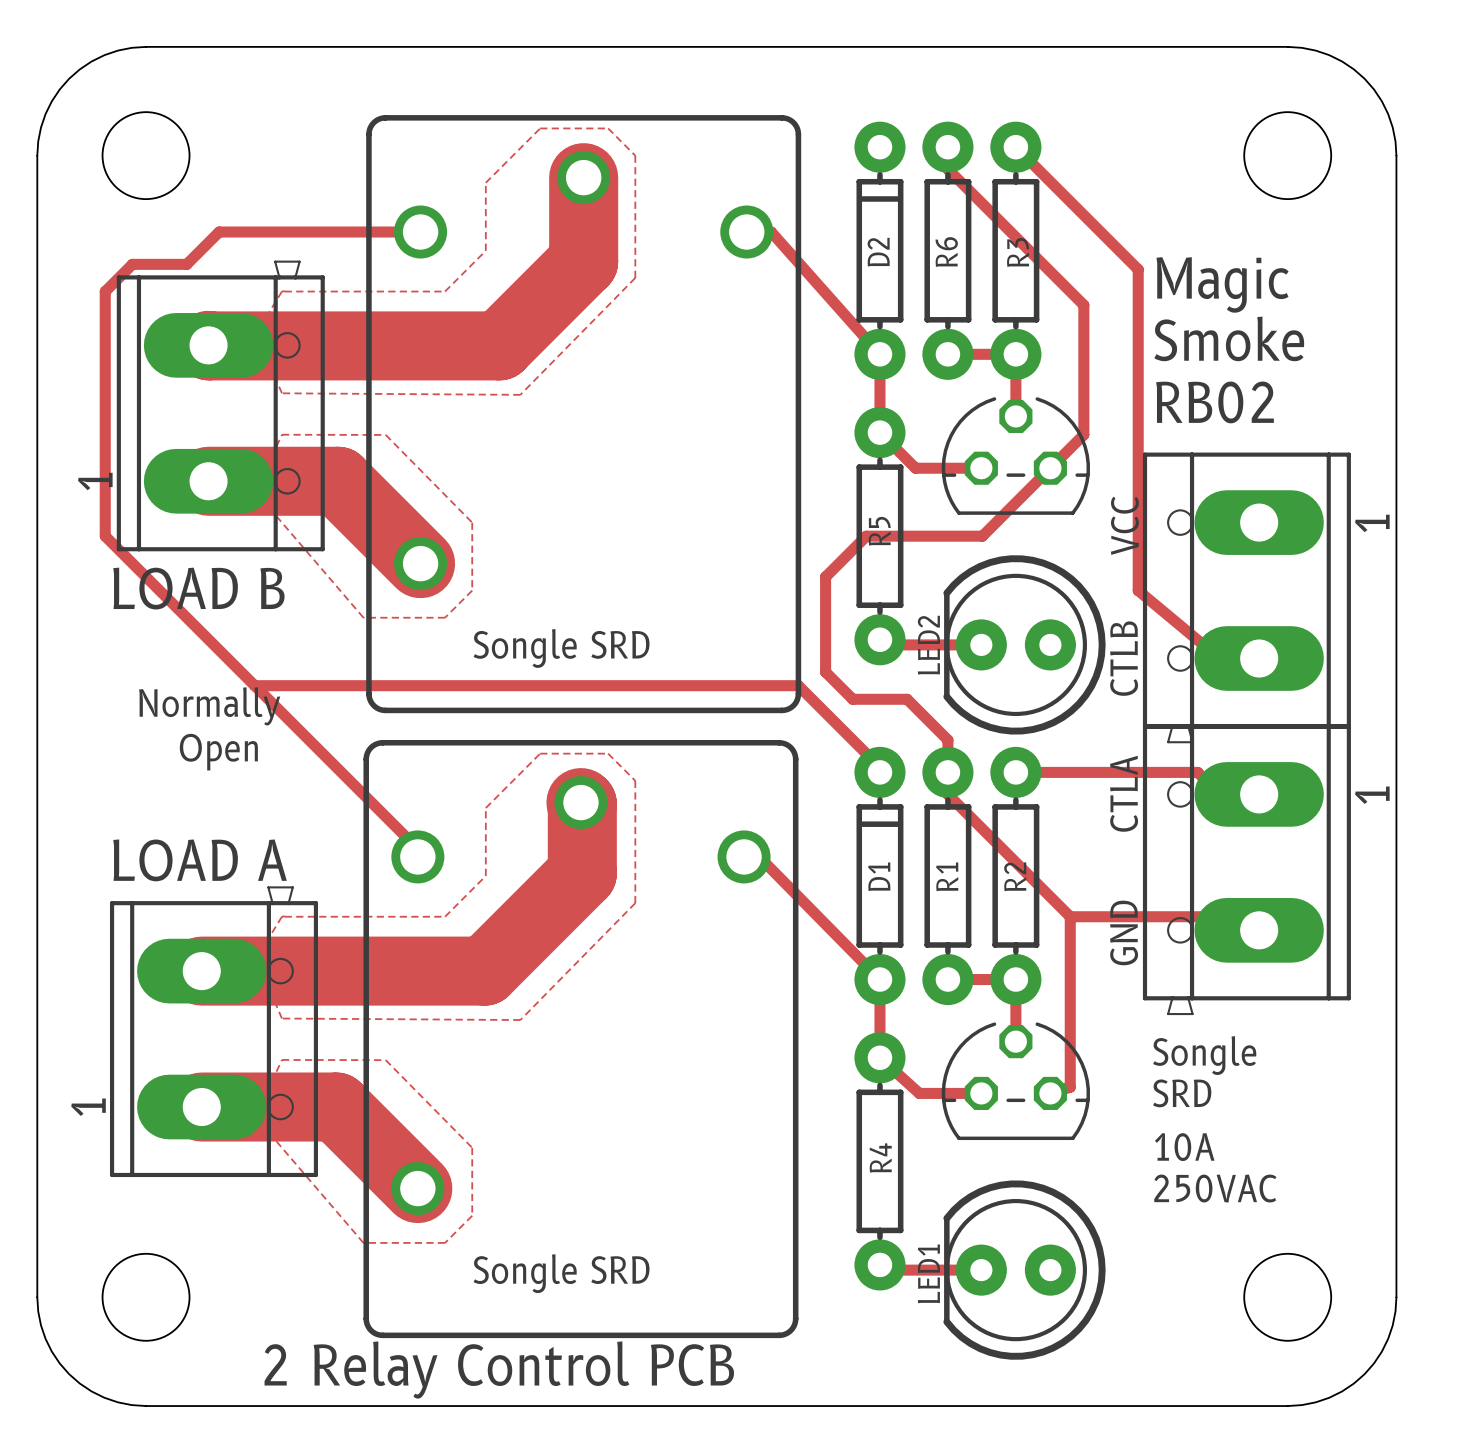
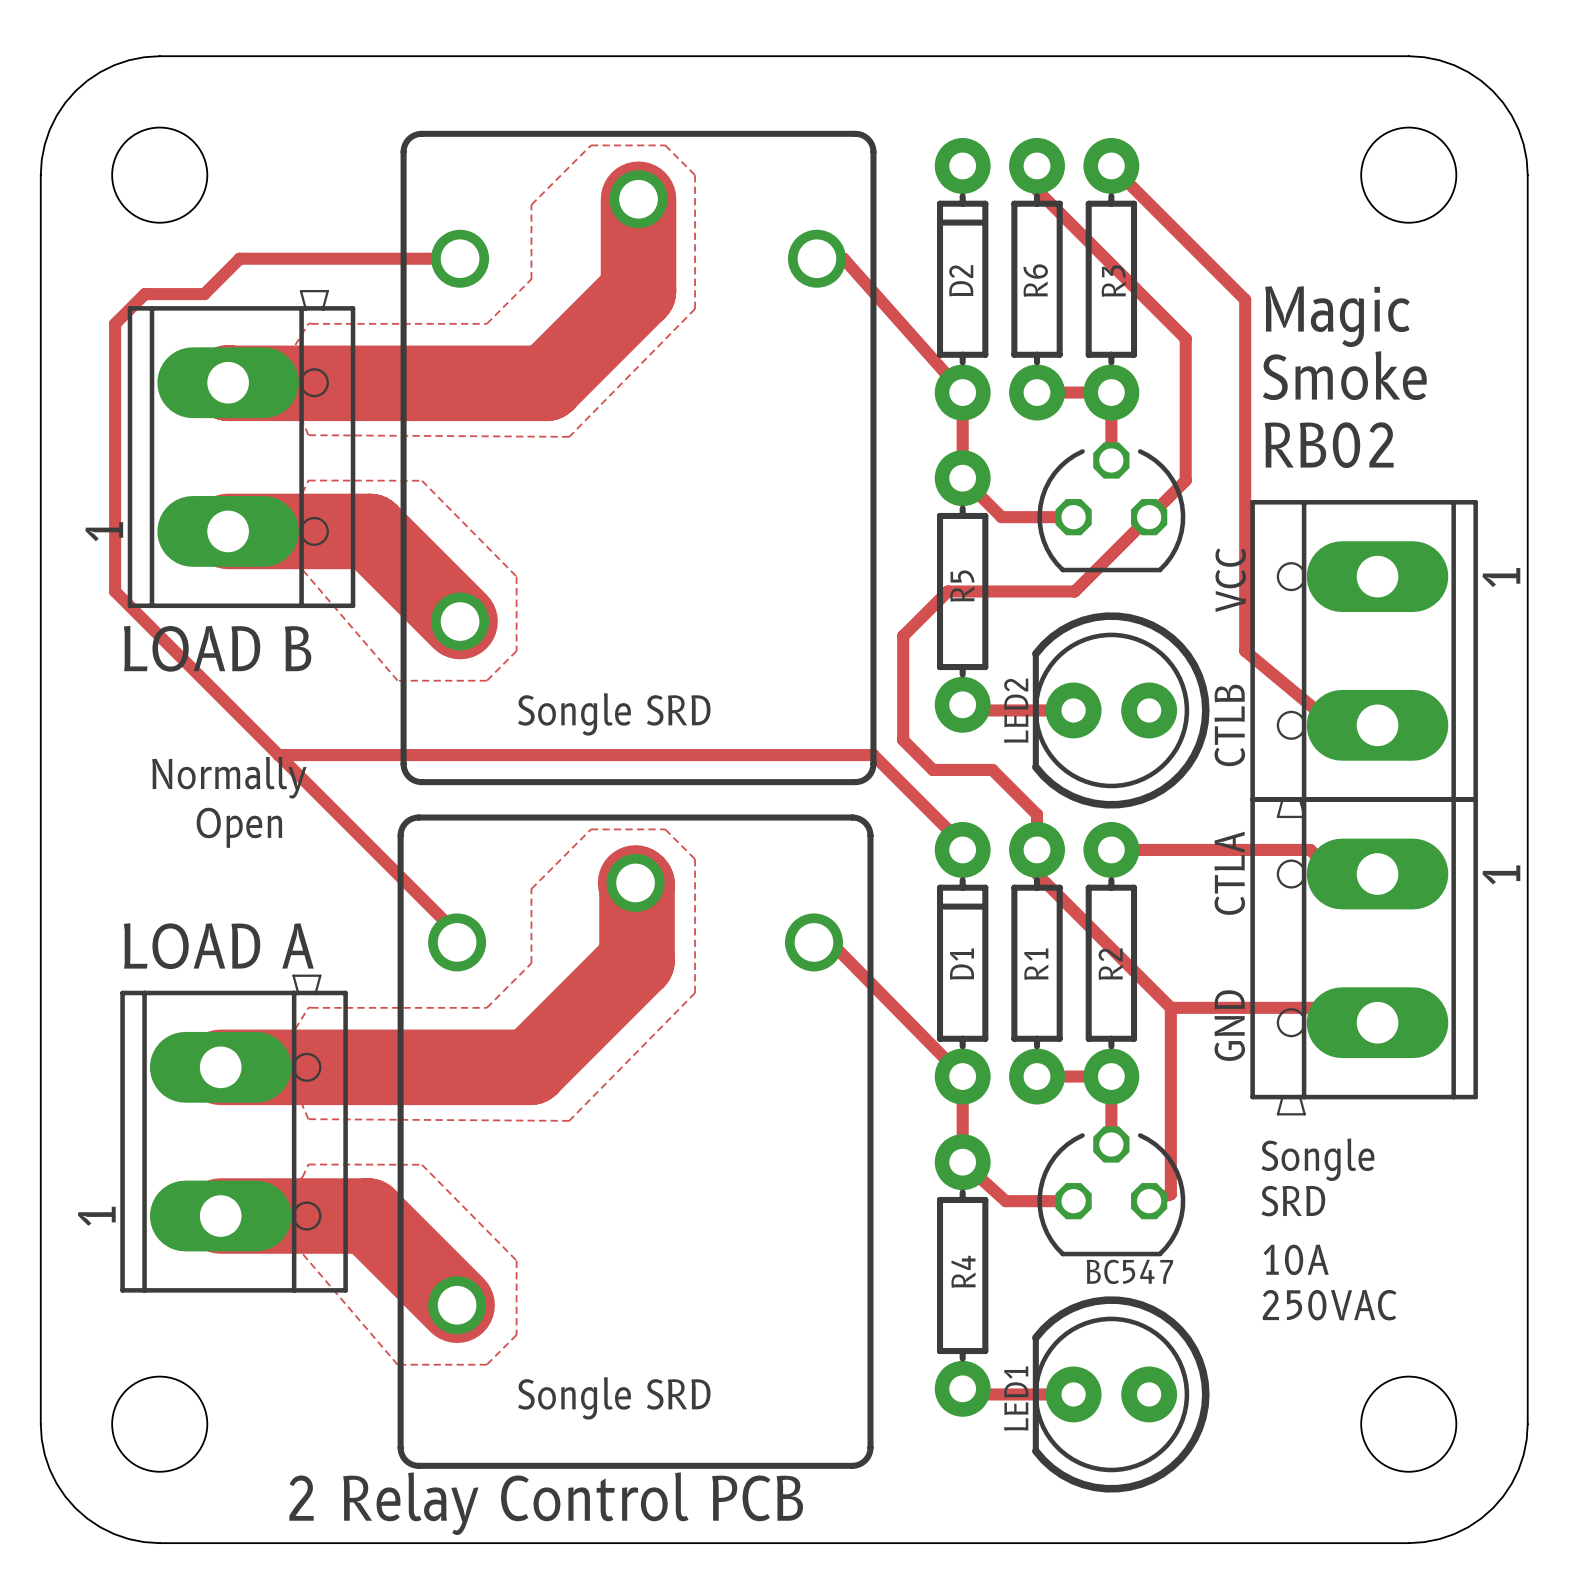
part footprint: [941, 397, 1090, 515] -> [1037, 442, 1186, 573]
part footprint: [941, 1022, 1090, 1141] -> [1037, 1126, 1186, 1257]
text: none -> BC547 (1129, 1271)

